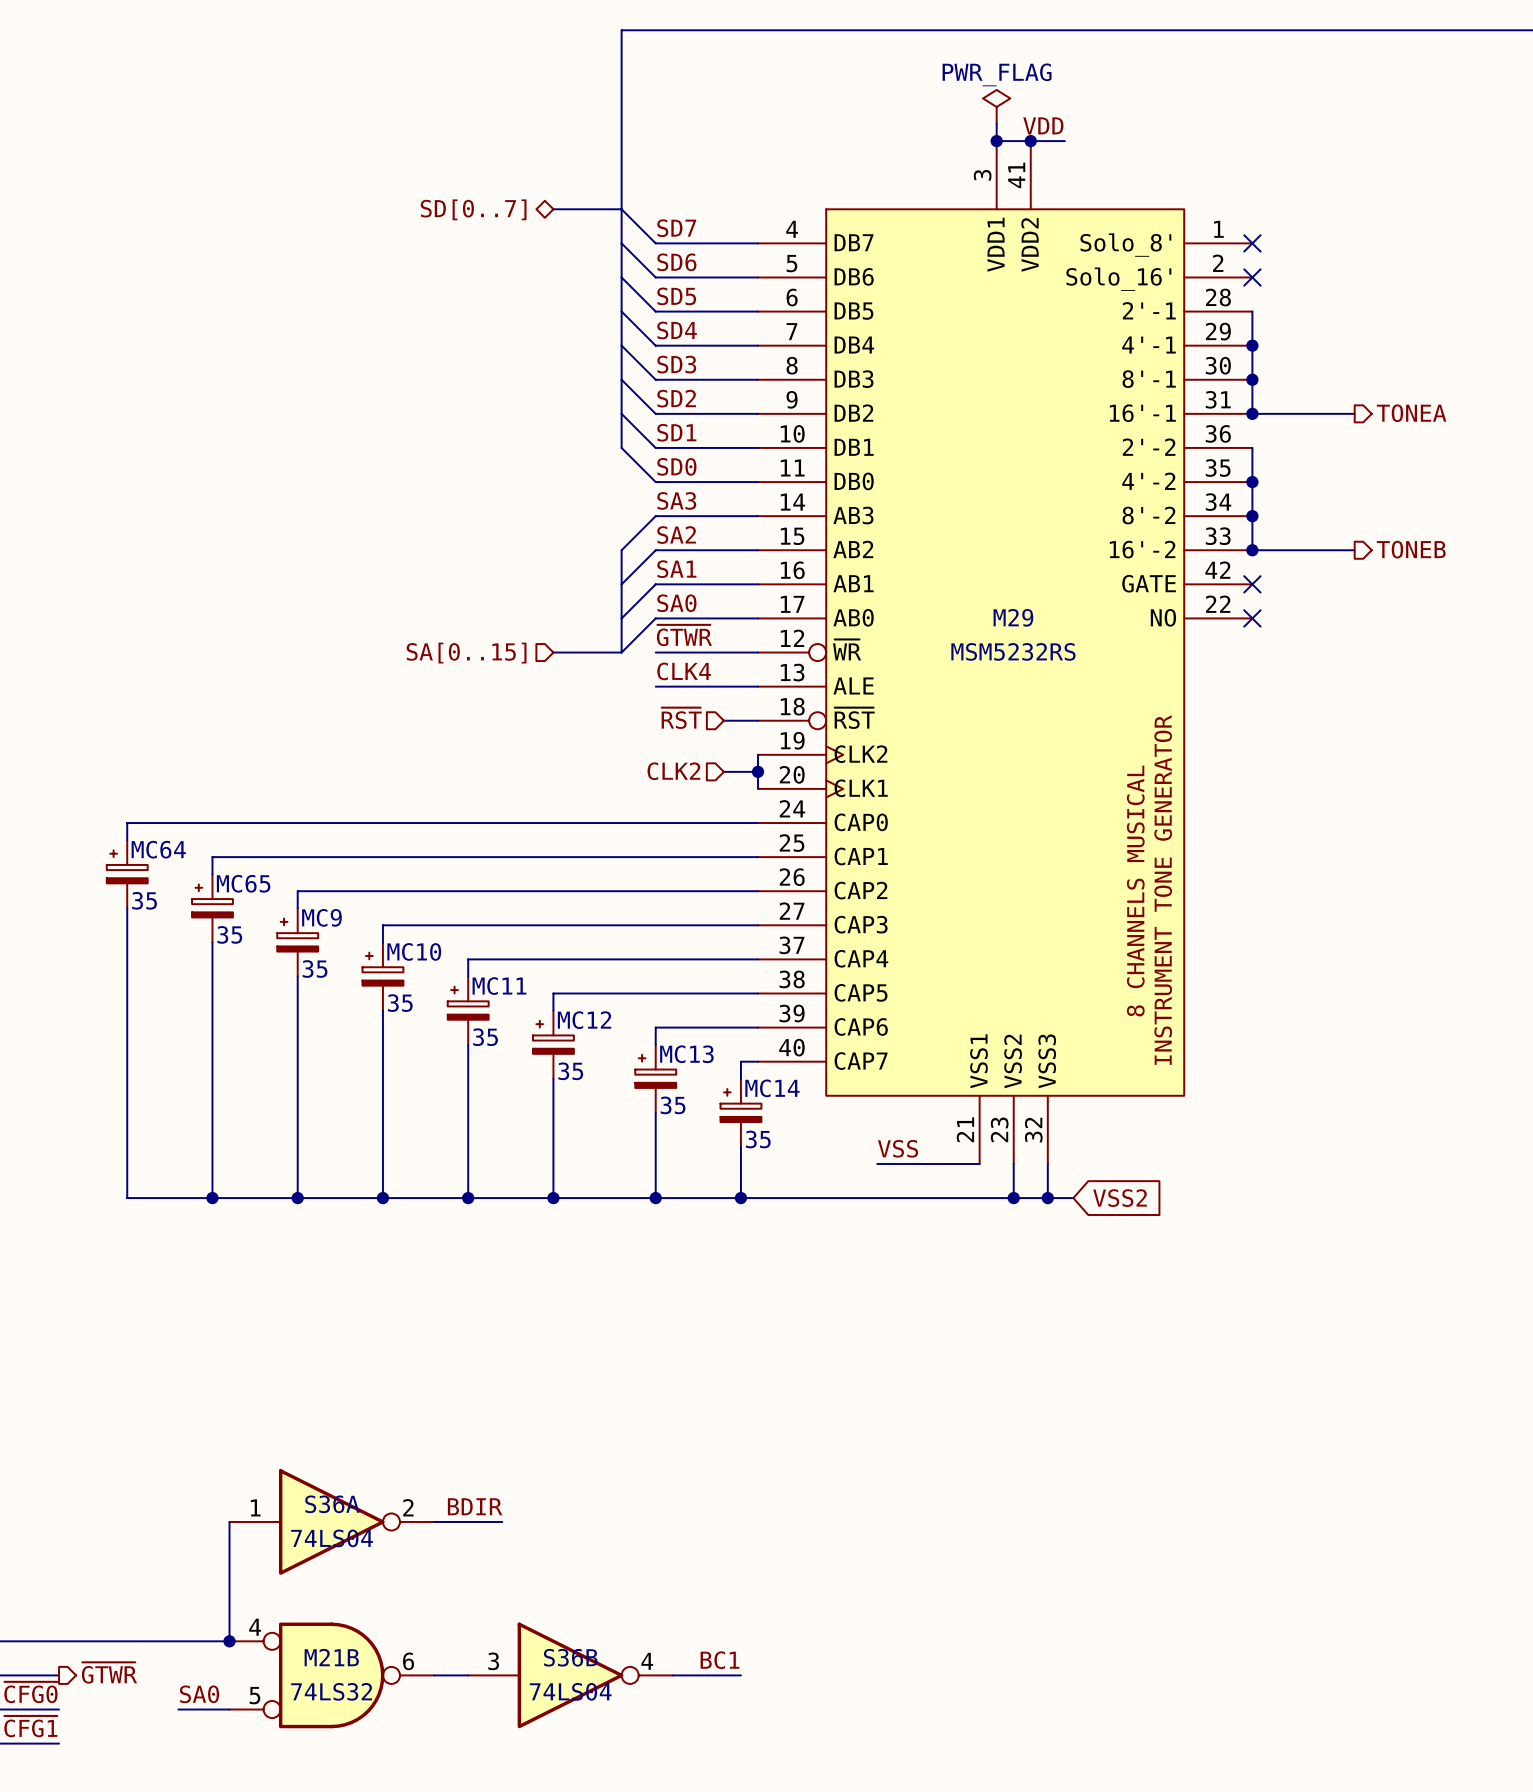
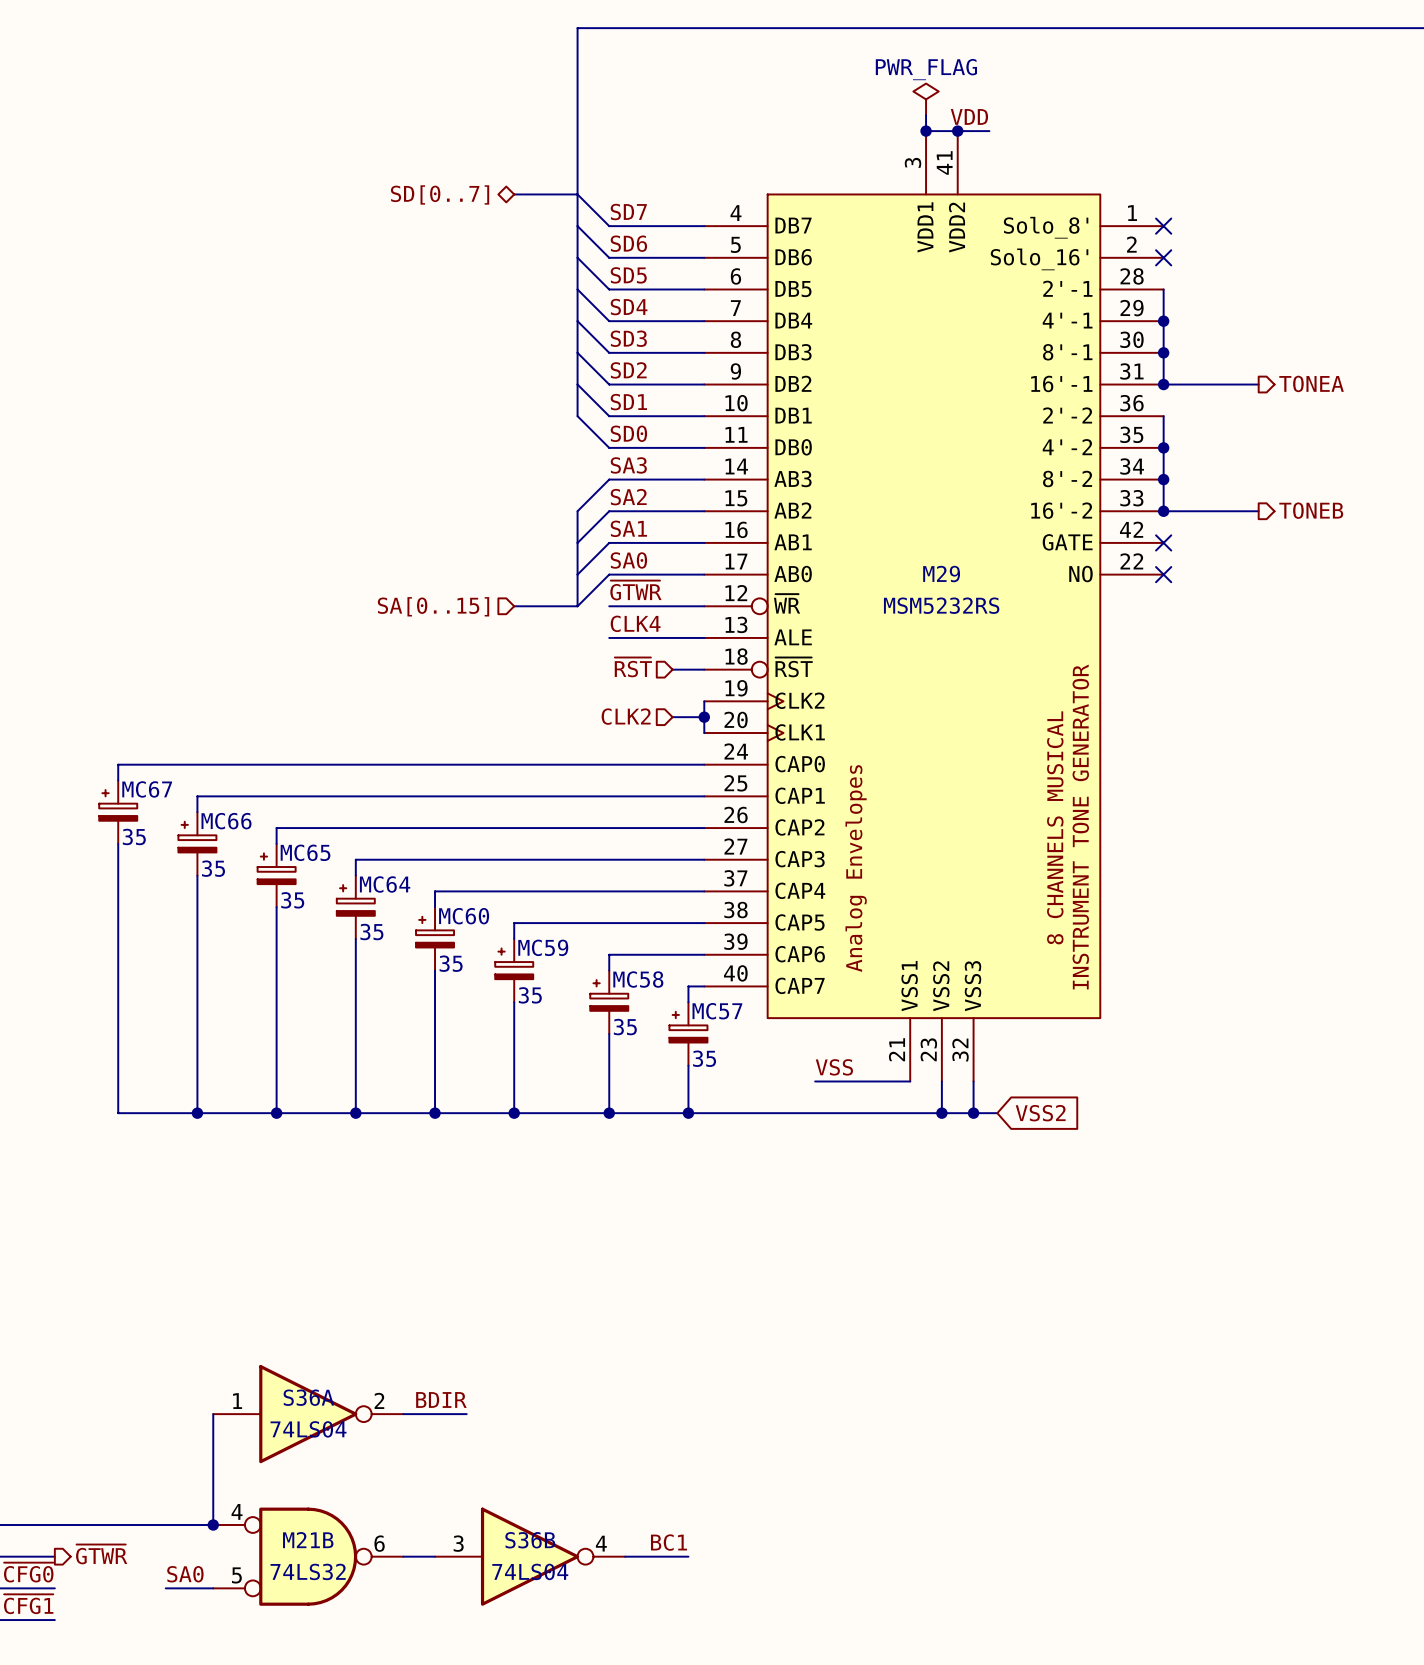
MC64 name: MC64 (158, 849) -> MC67 (147, 789)
MC65 name: MC65 (243, 883) -> MC66 (226, 821)
MC9 name: MC9 (321, 917) -> MC65 (305, 852)
M29 text: none -> Analog Envelopes (856, 868)
MC10 name: MC10 (414, 951) -> MC64 (385, 884)
MC11 name: MC11 (499, 986) -> MC60 (464, 916)
MC12 name: MC12 (584, 1020) -> MC59 (543, 947)
MC13 name: MC13 (686, 1054) -> MC58 (638, 979)
MC14 name: MC14 (772, 1088) -> MC57 (717, 1011)

